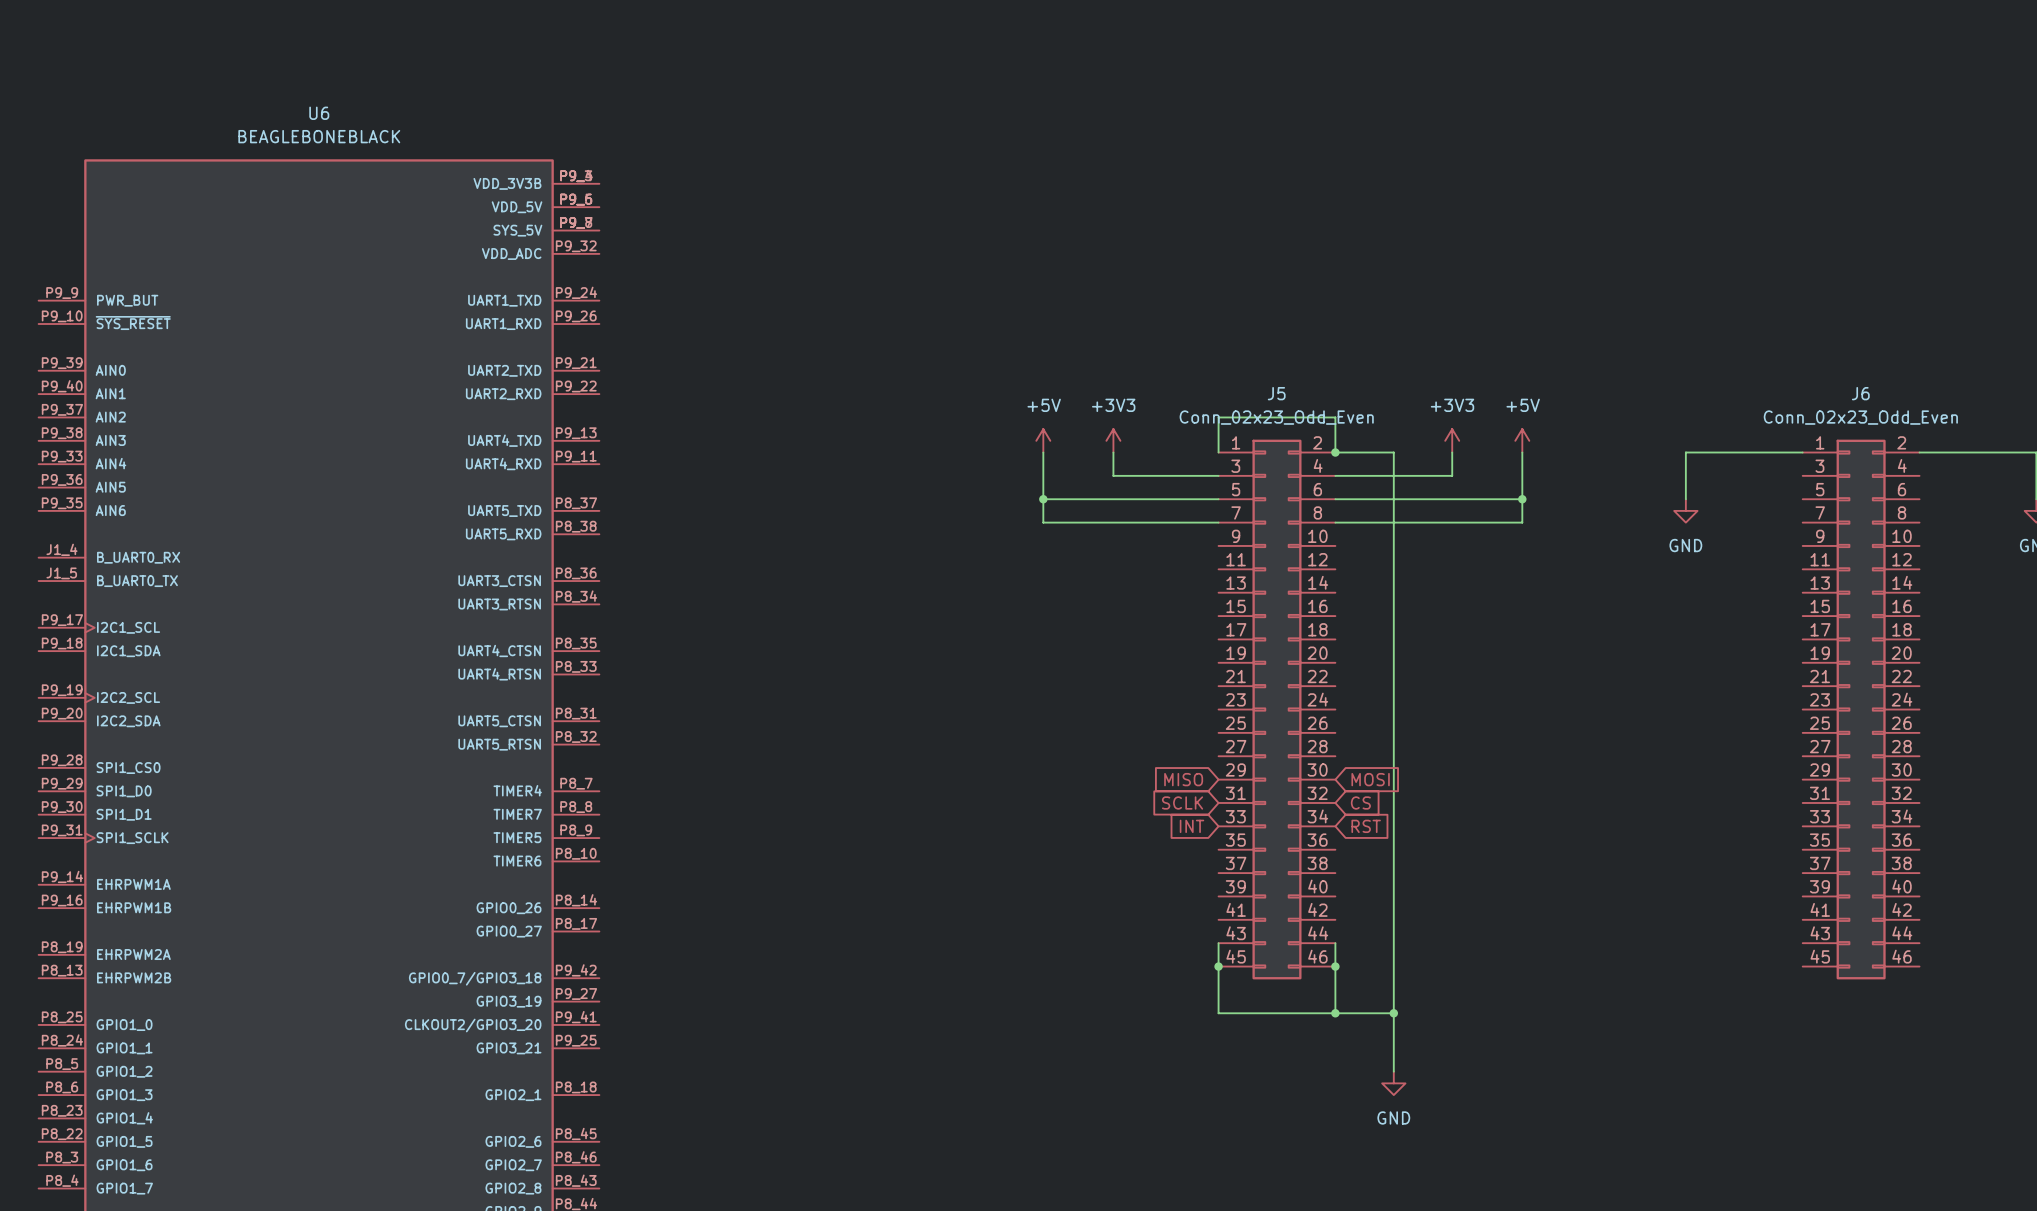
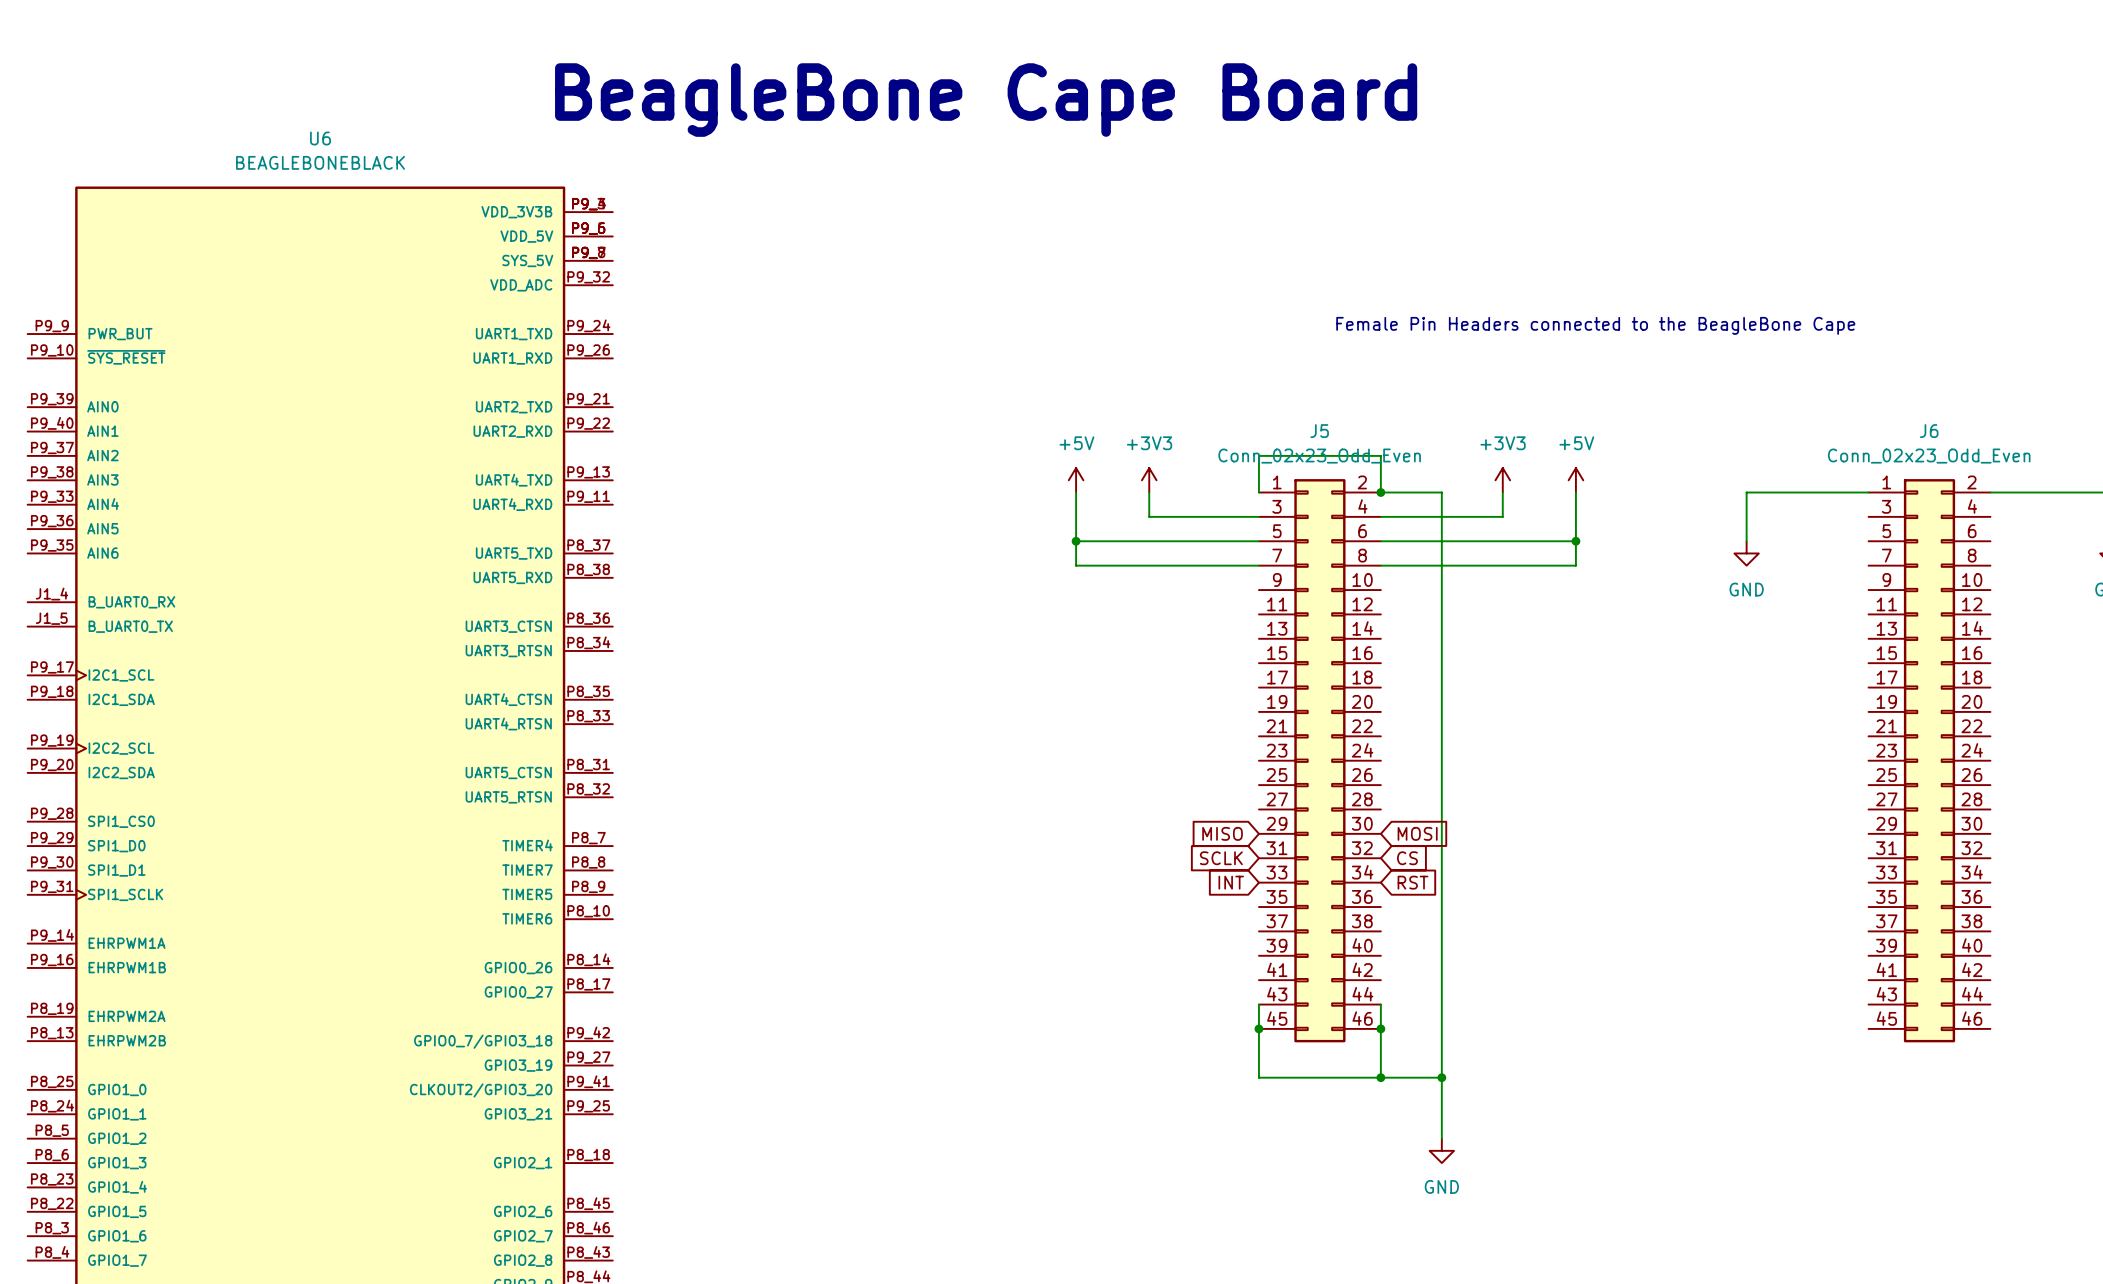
text: none -> BeagleBone Cape Board (986, 100)
text: none -> Female Pin Headers connected to the BeagleBone Cape (1595, 325)

